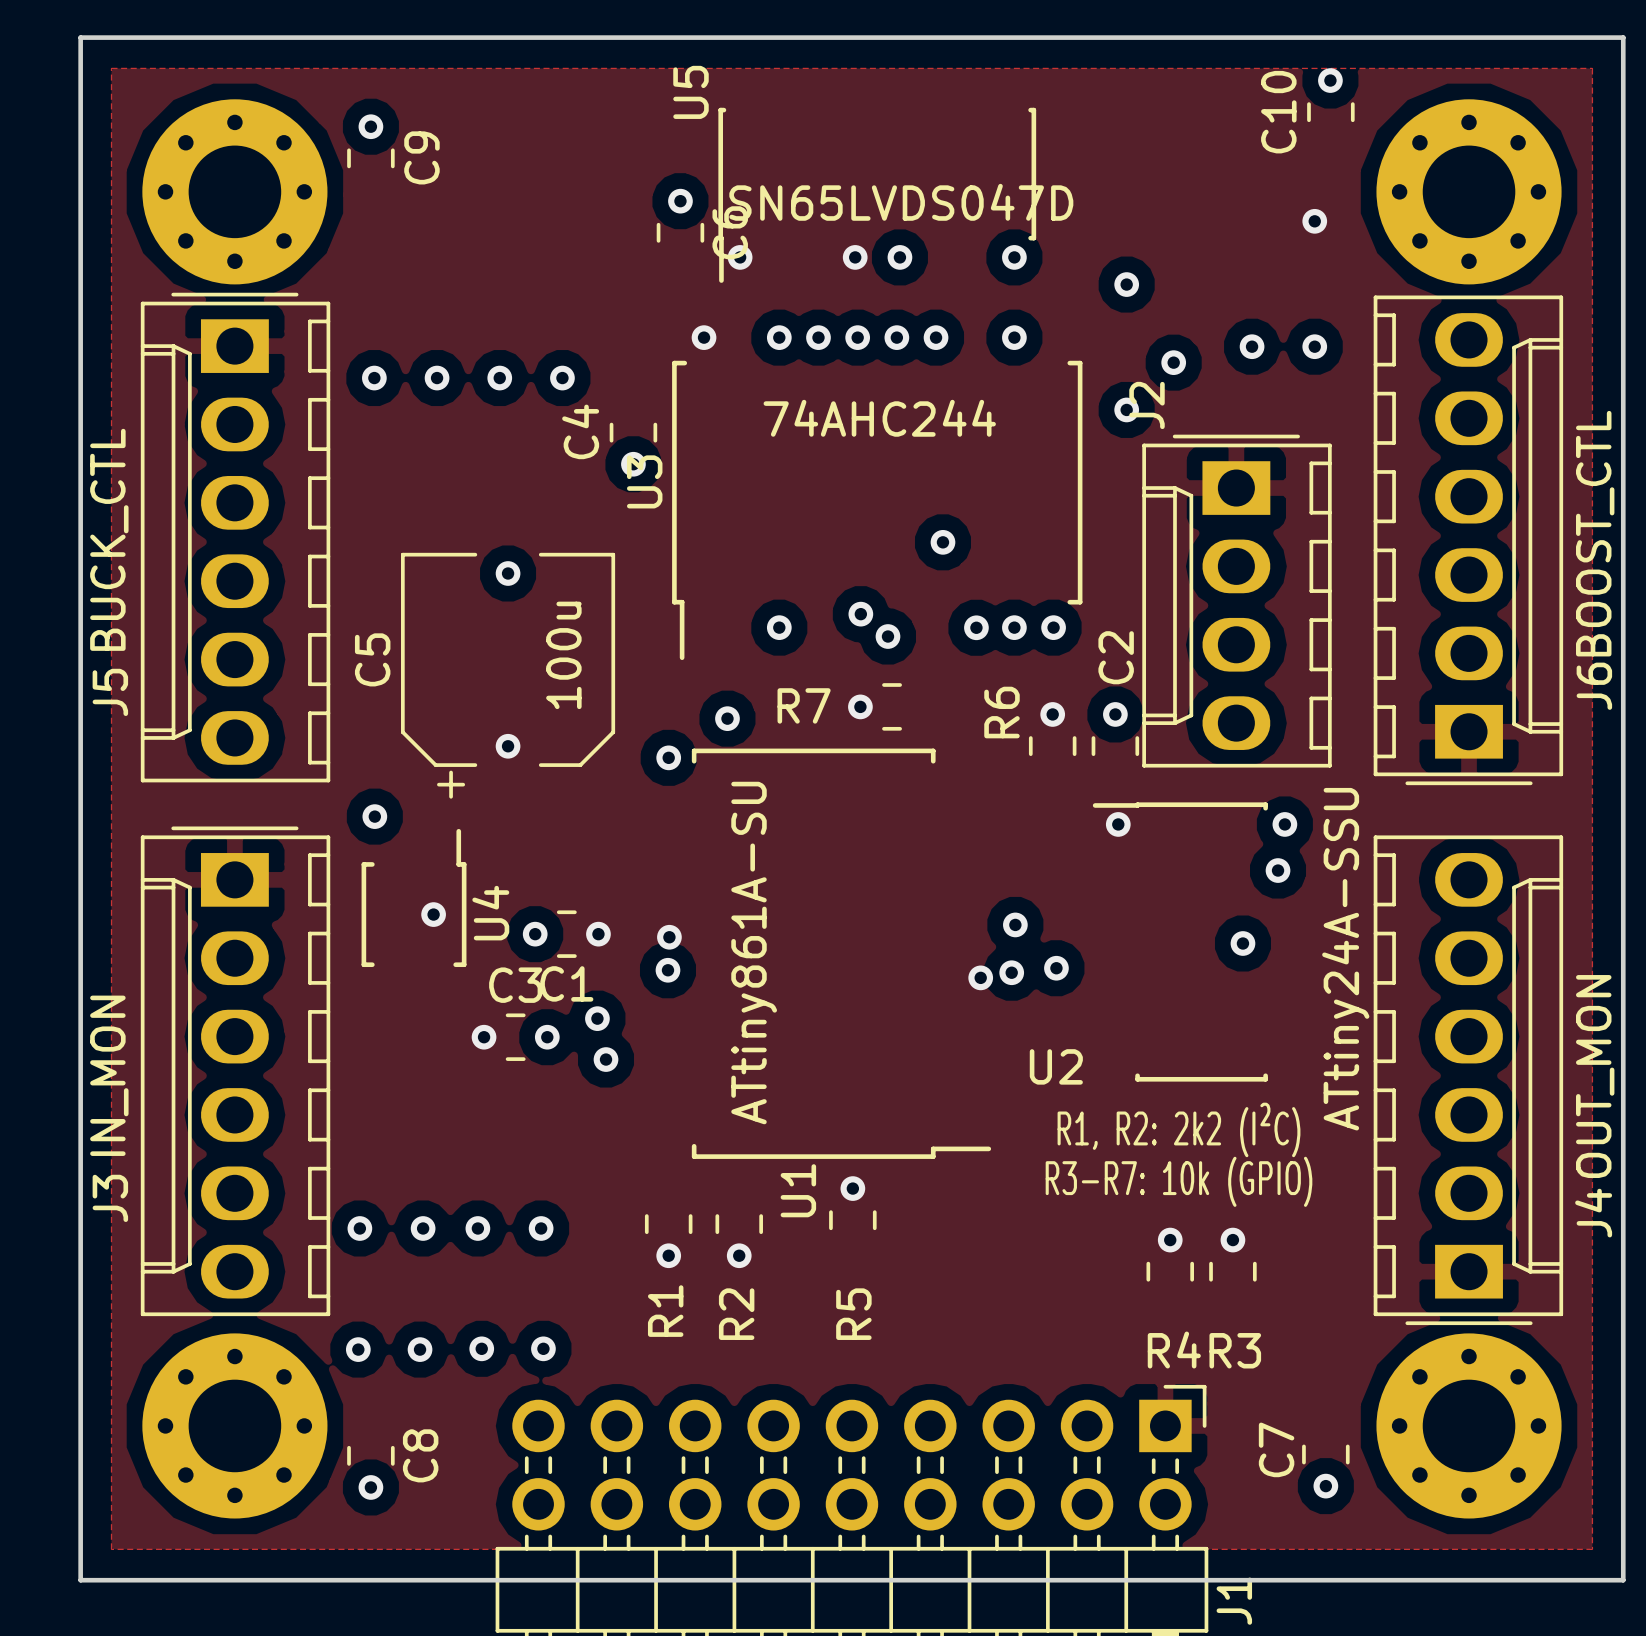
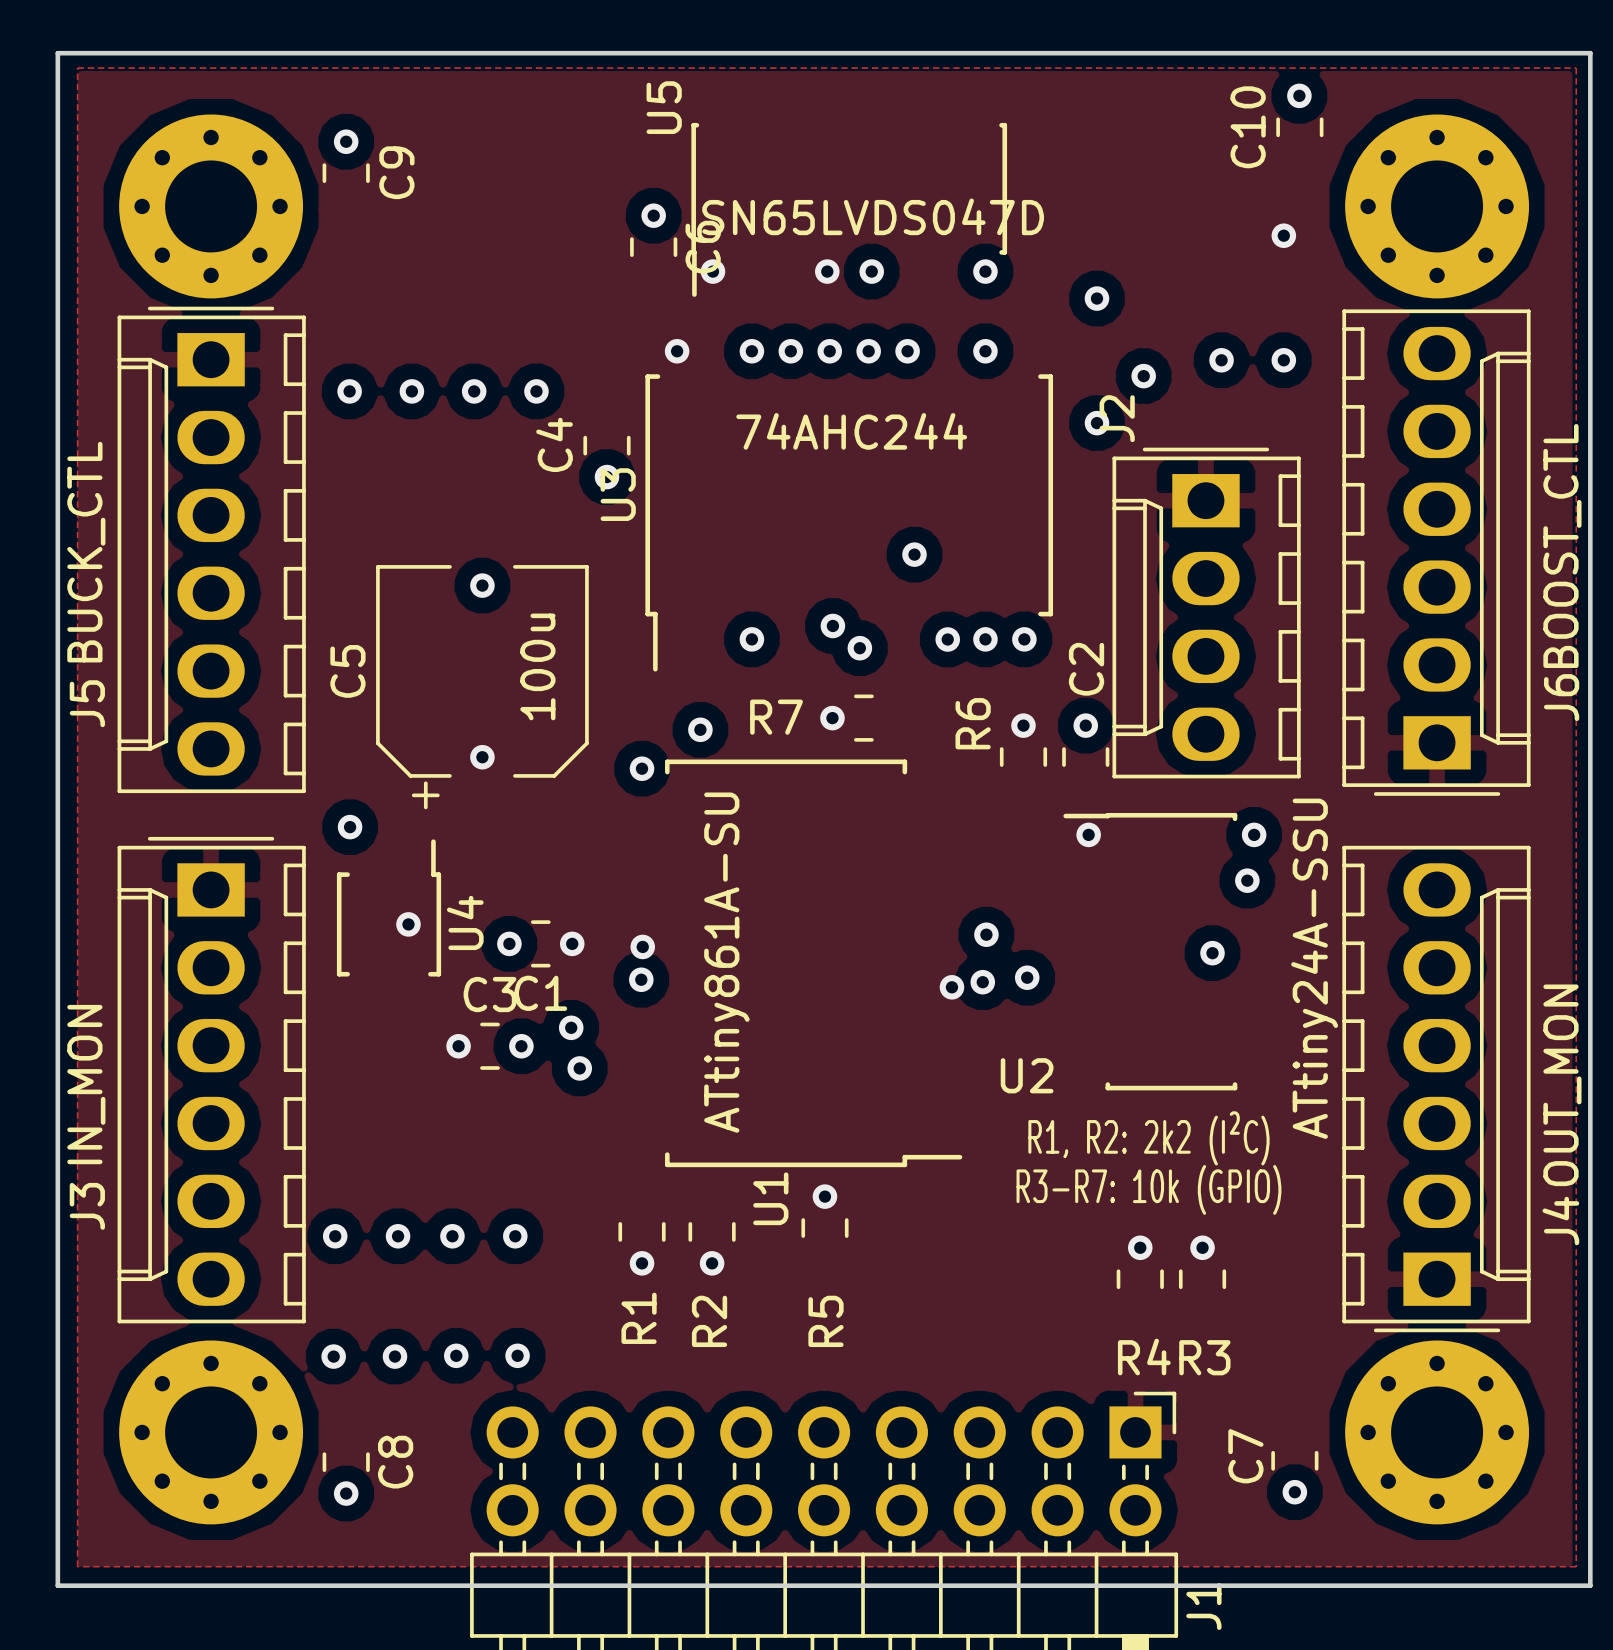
zone outline: (111, 68) (1592, 68) (1592, 1549) (111, 1549) (111, 68) -> (77, 68) (77, 1566) (1576, 1566) (1576, 68) (77, 68)

